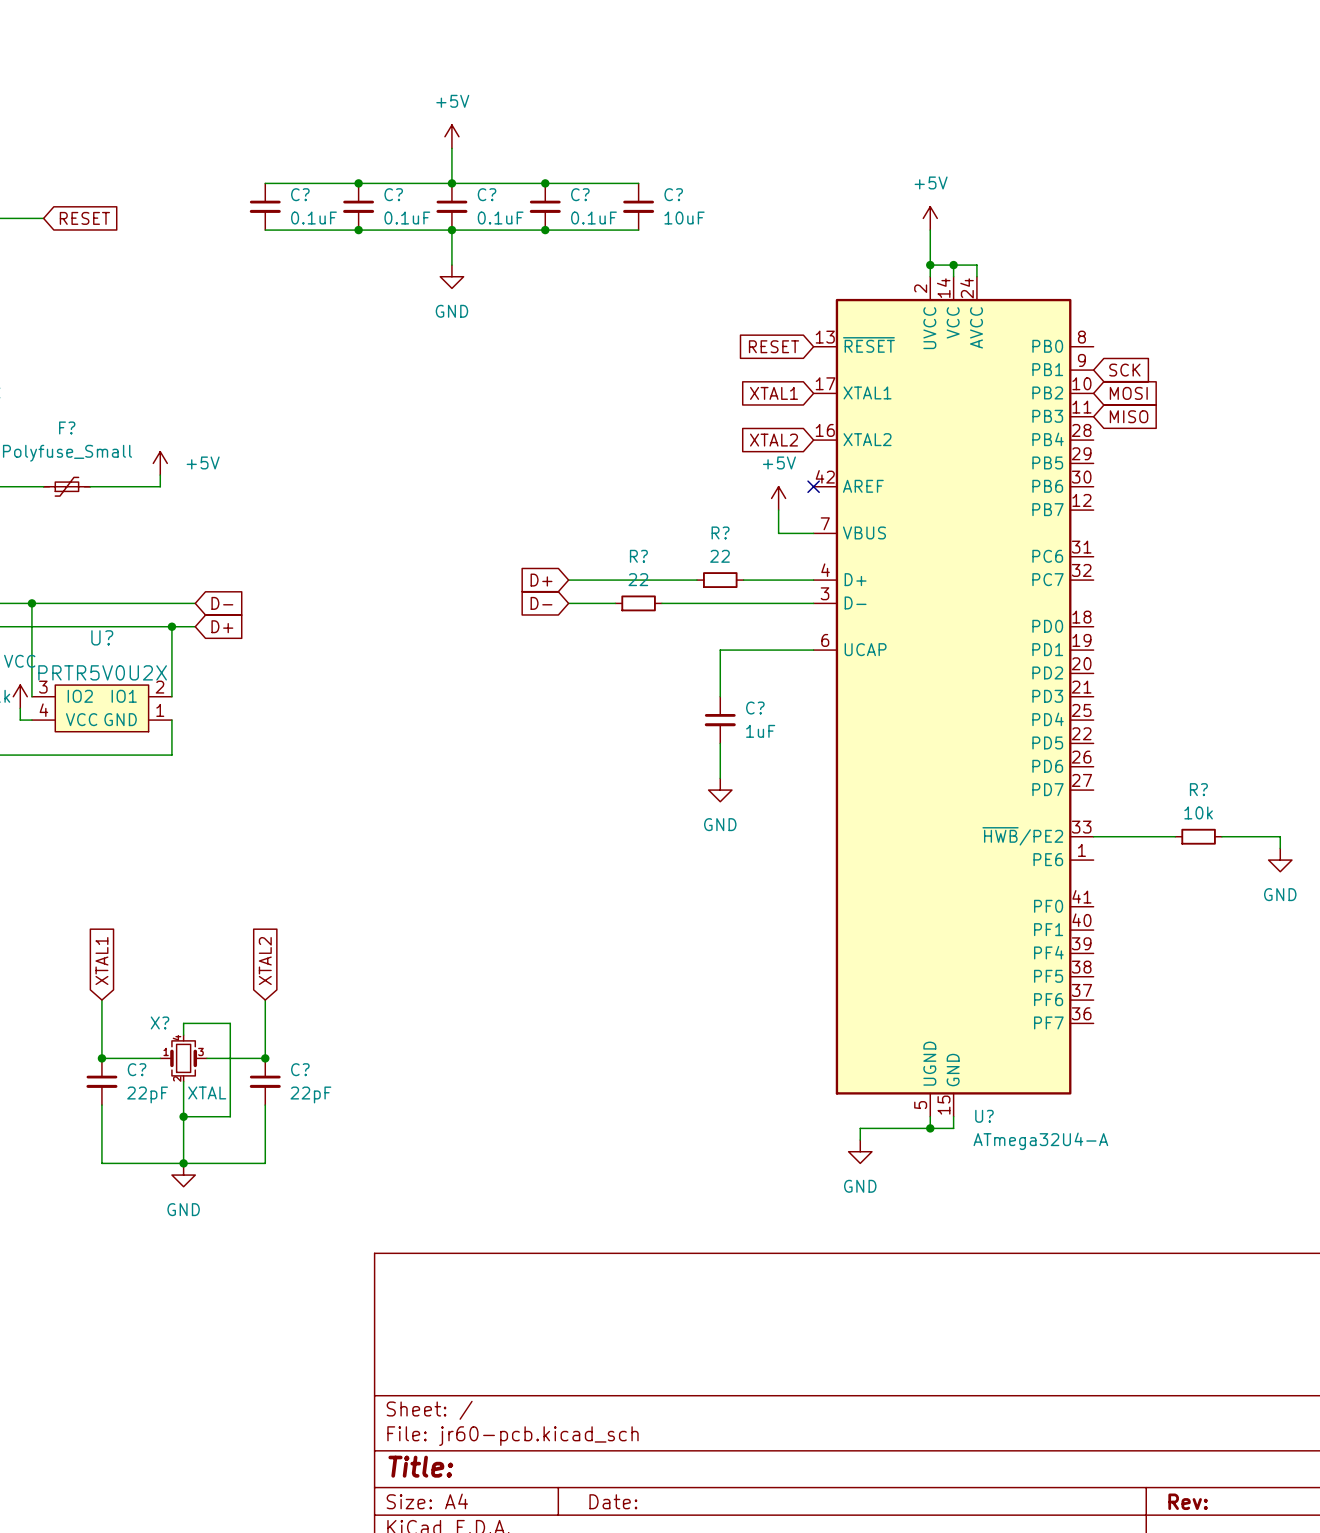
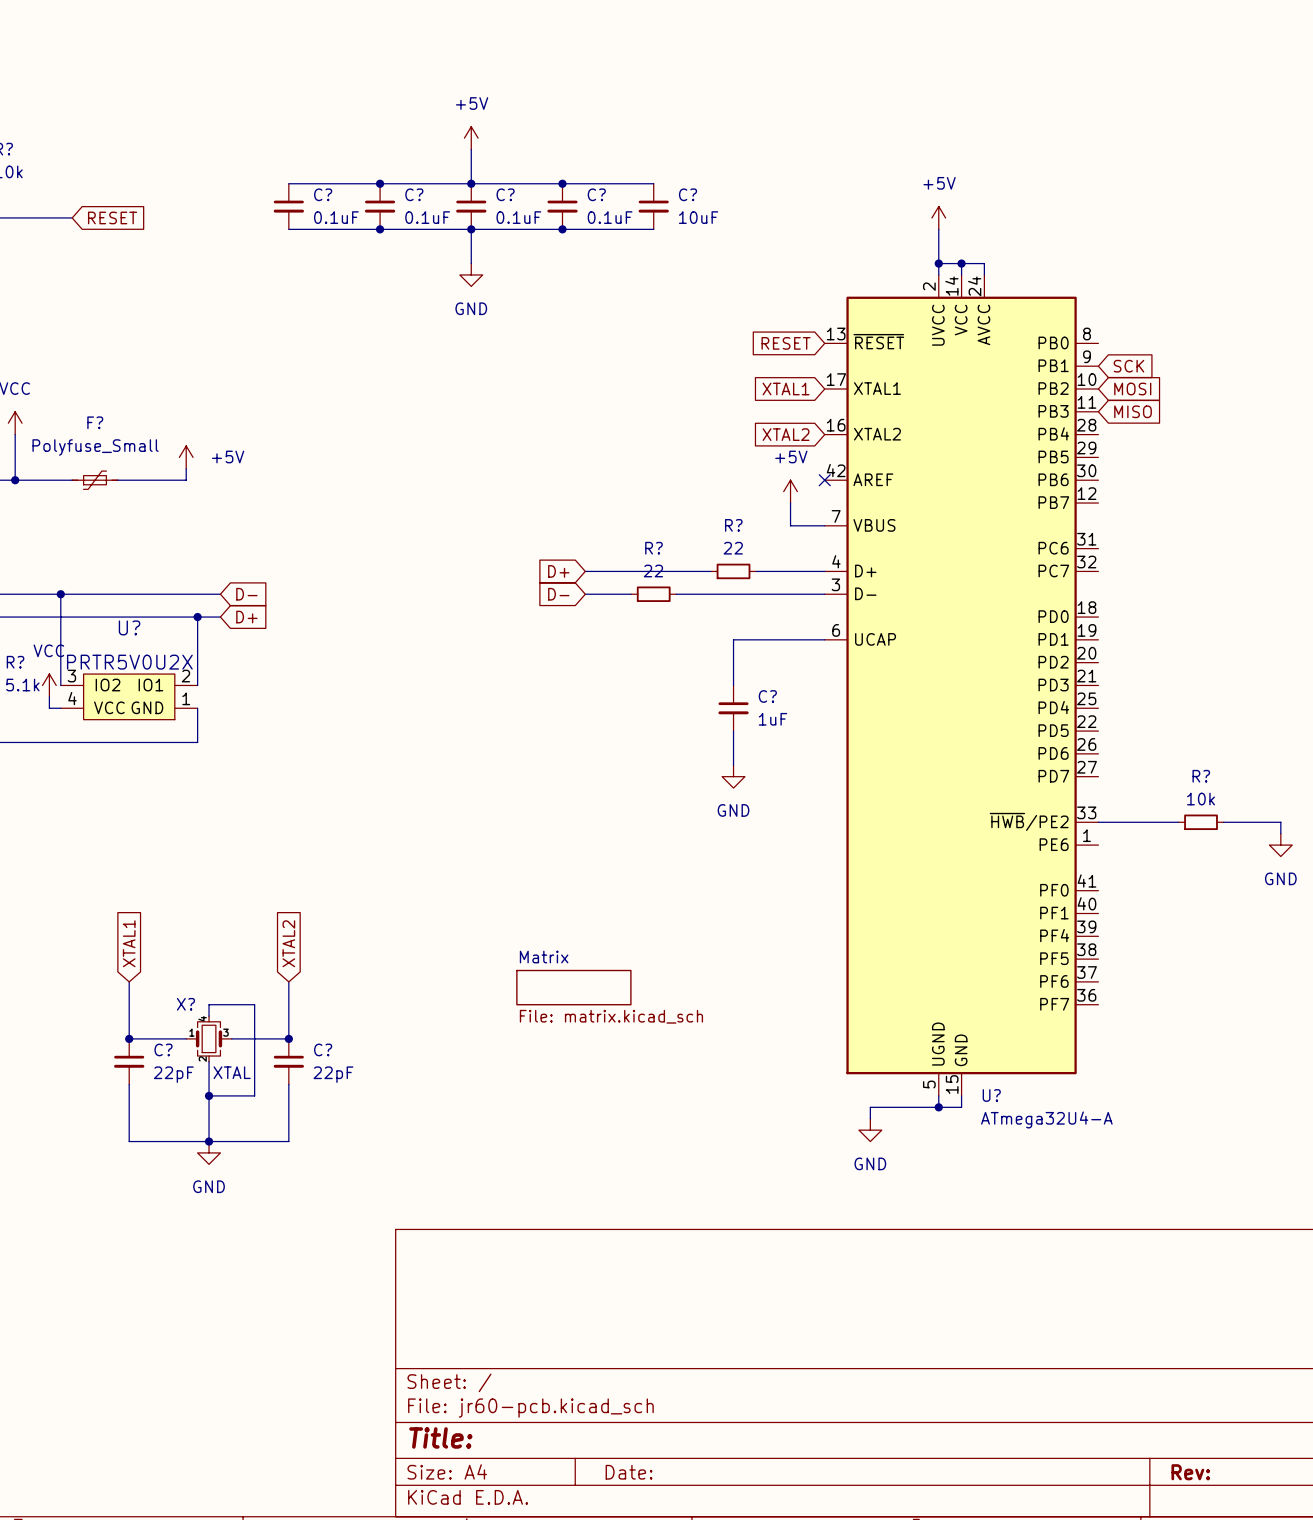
sheet Matrix: none -> File: matrix.kicad_sch (573, 987)

